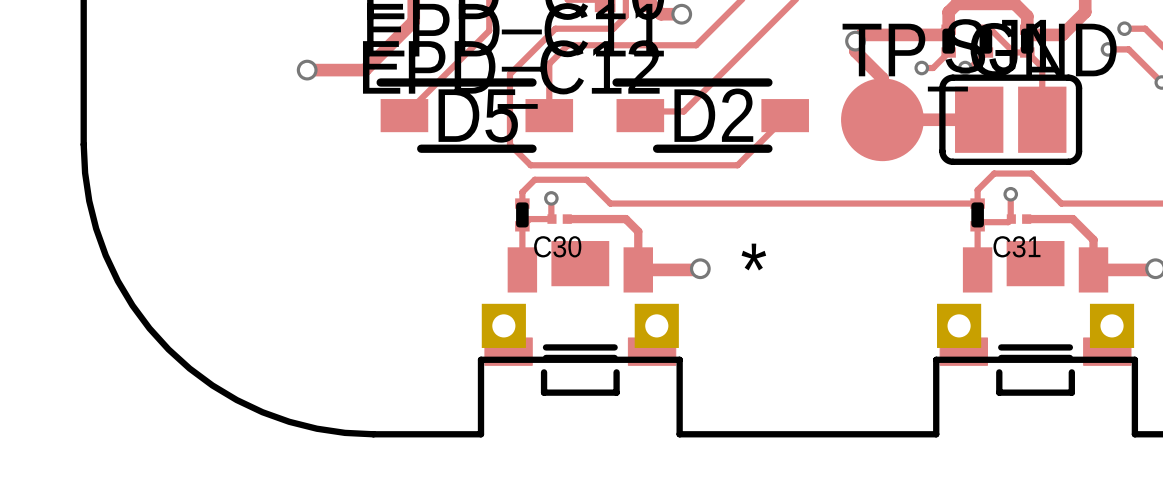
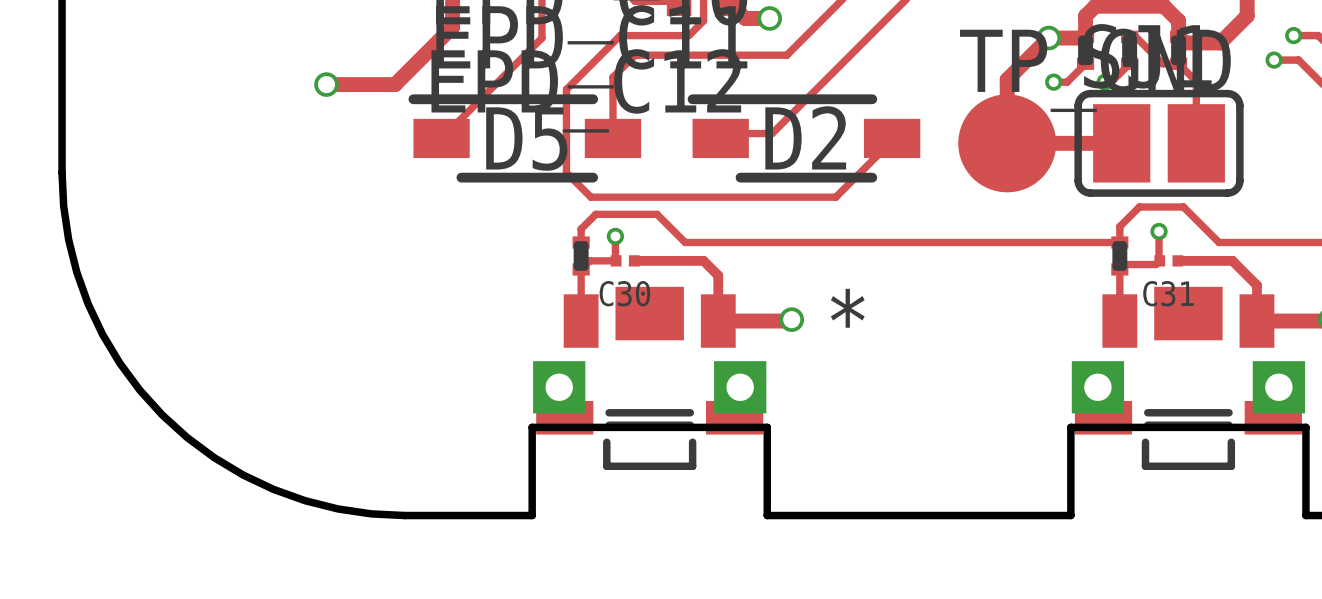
track: (947, 30) (943, 34) (861, 34) (855, 41) (855, 51) (882, 78) -> (1084, 38) (1048, 38) (1007, 79) (1007, 94)
via position: (855, 41) -> (1048, 38)

